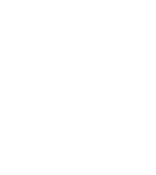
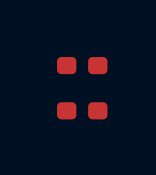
part: none -> (82, 65)
part: none -> (82, 110)

